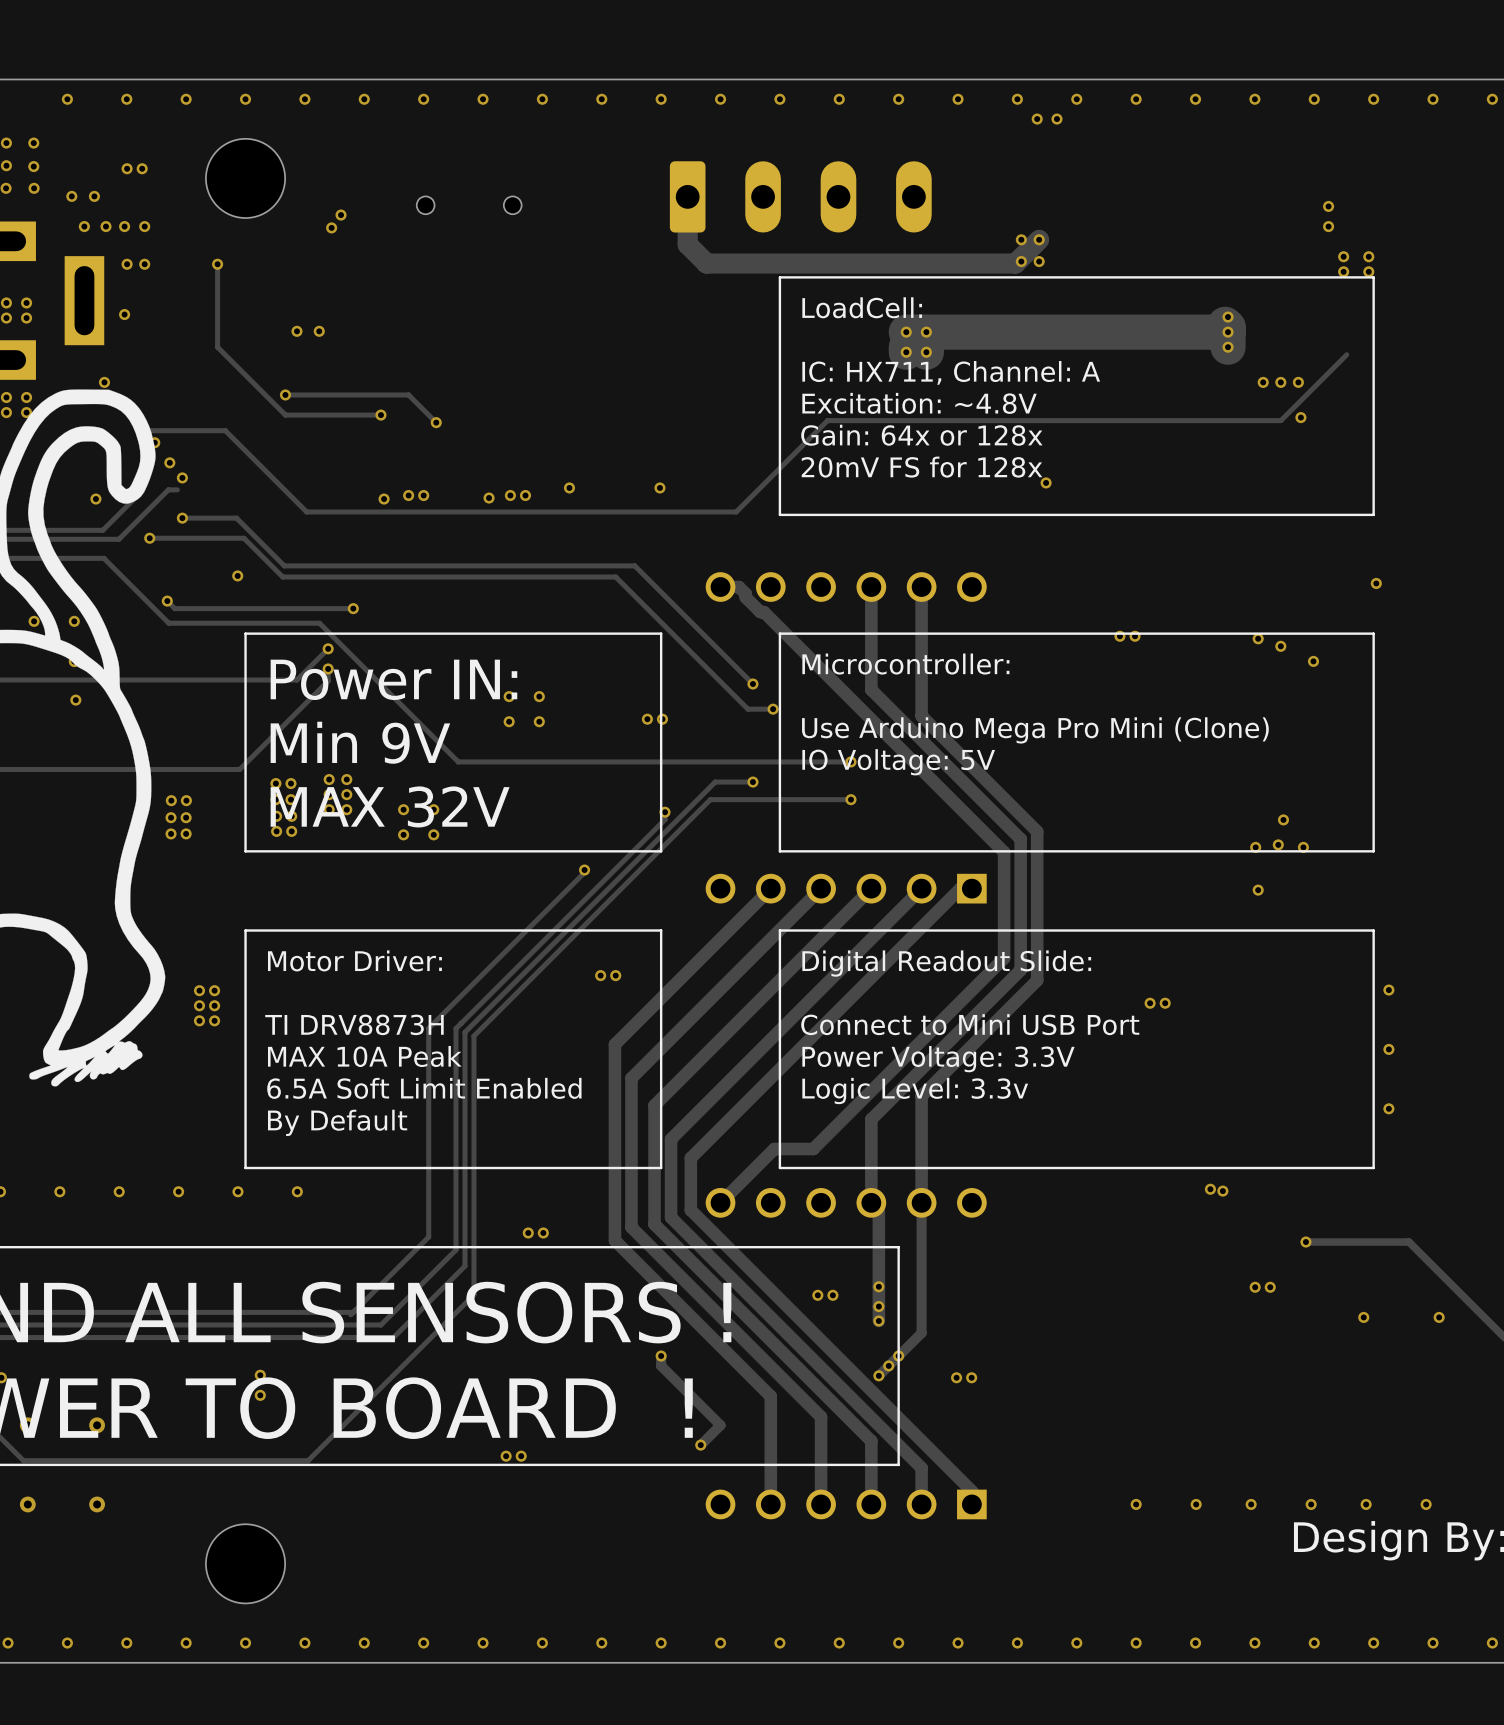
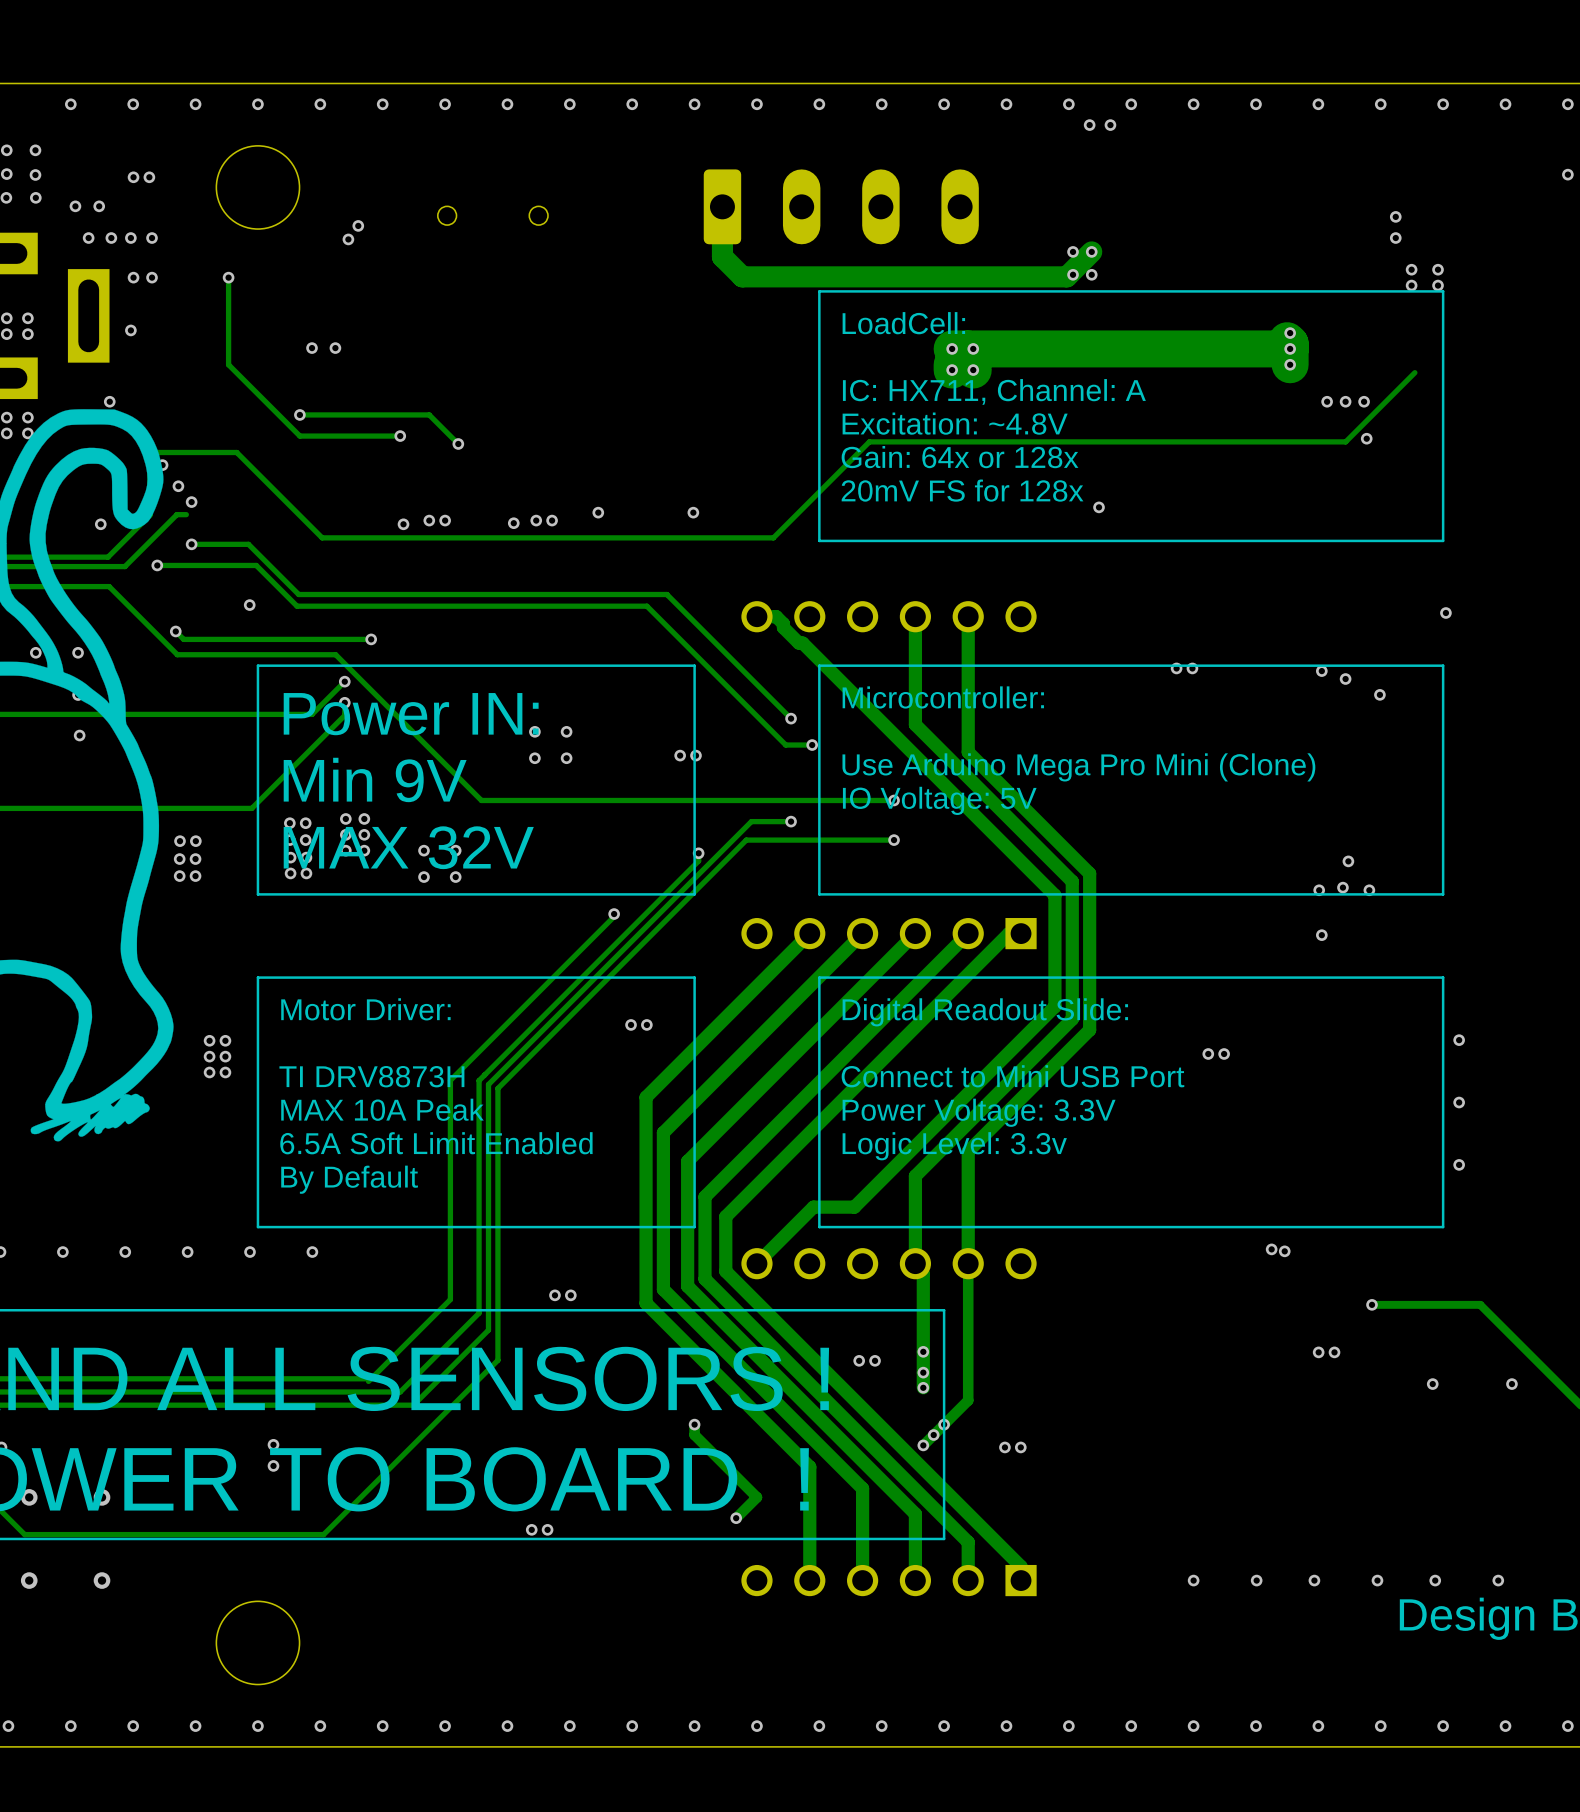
via: none -> (1567, 174)

